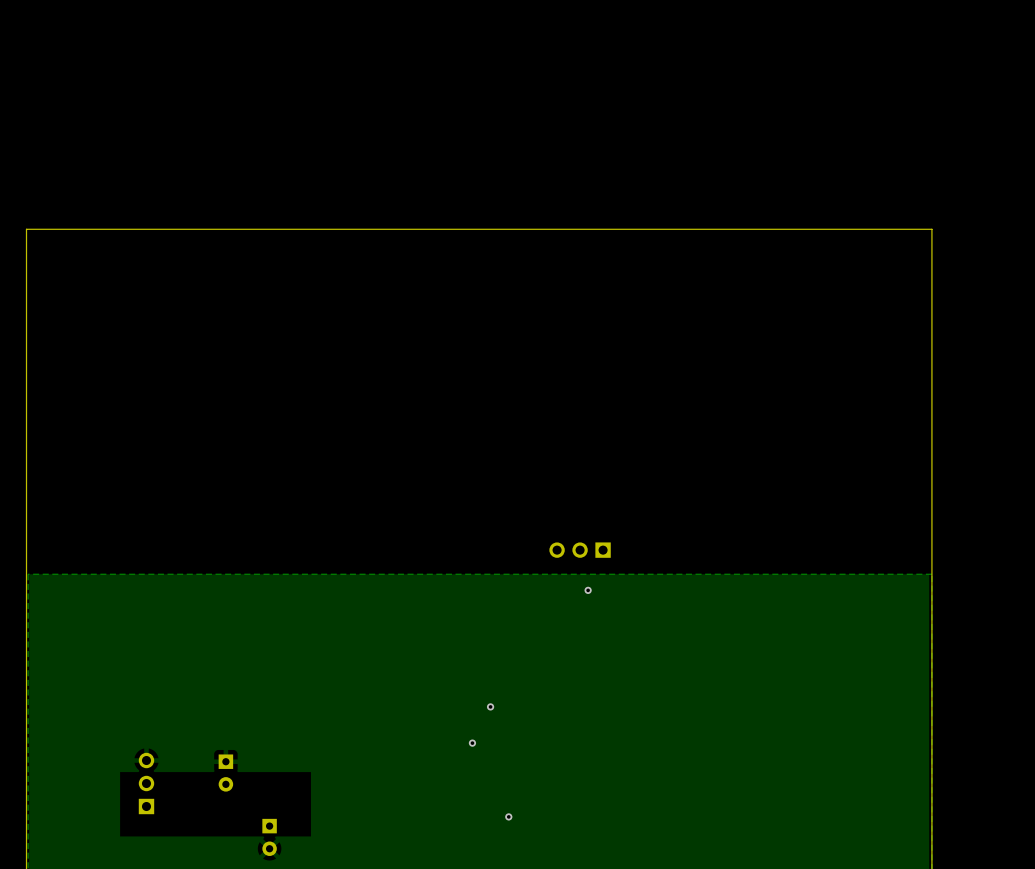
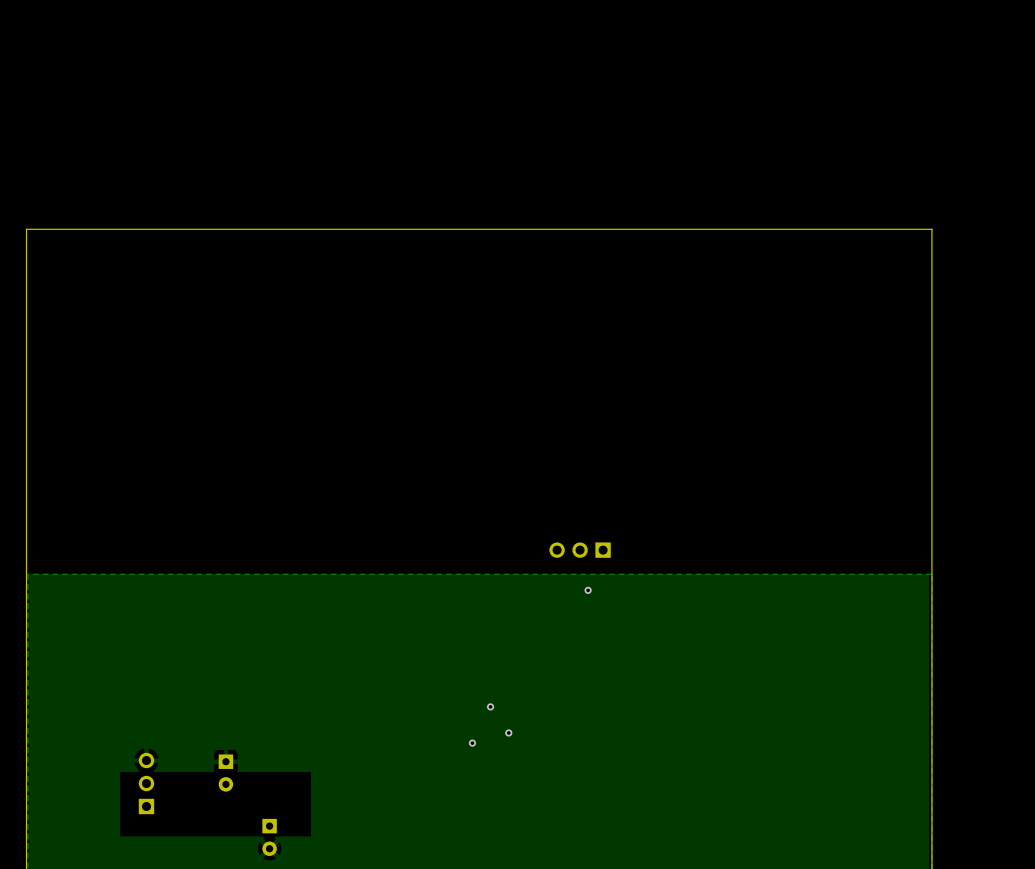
via: none -> (508, 732)
via: (508, 816) -> none

